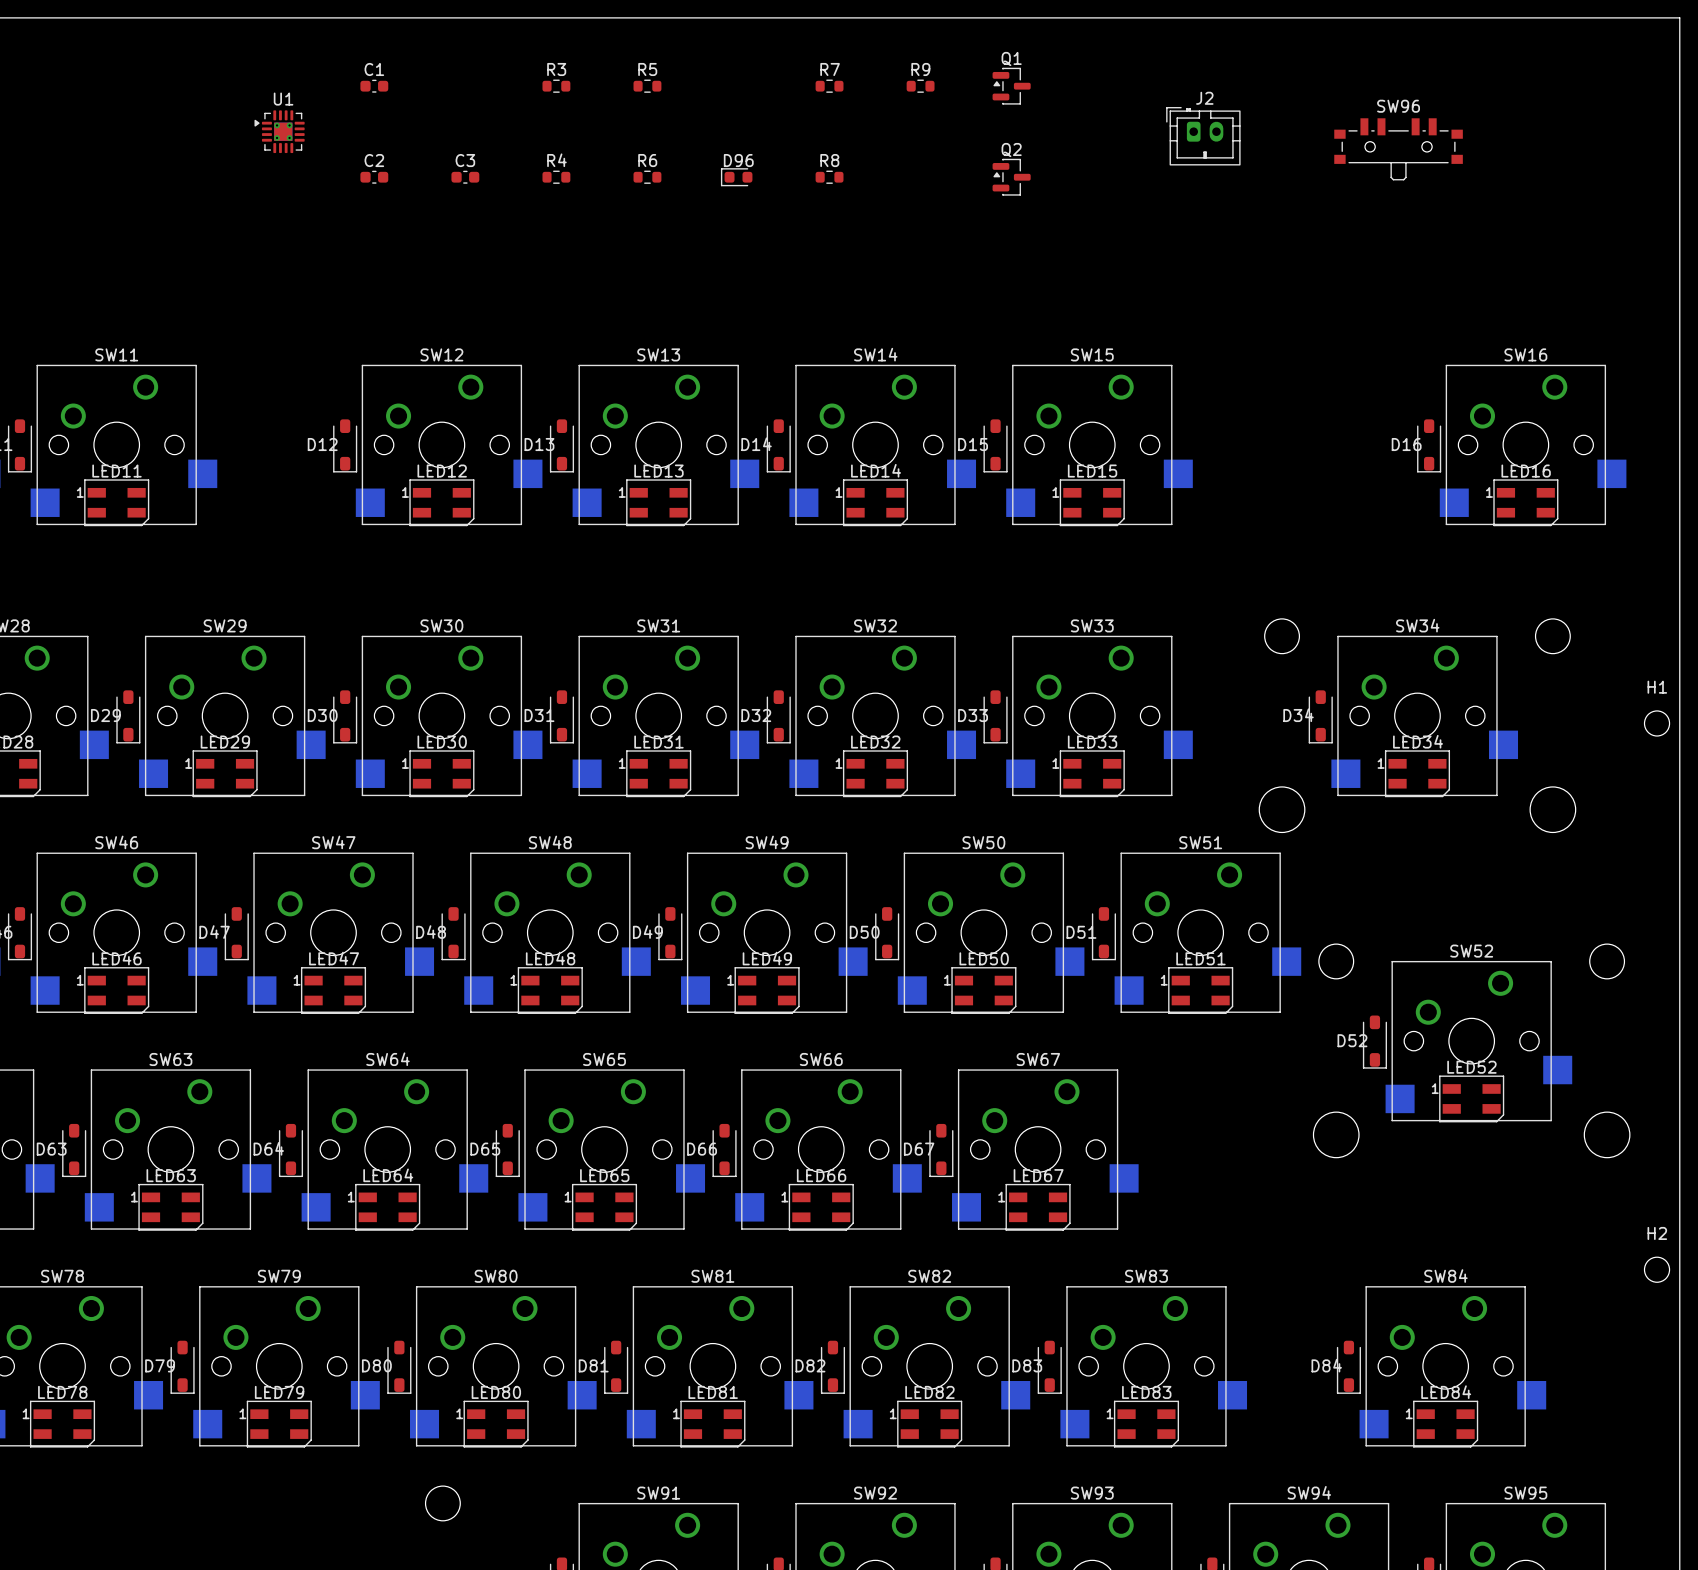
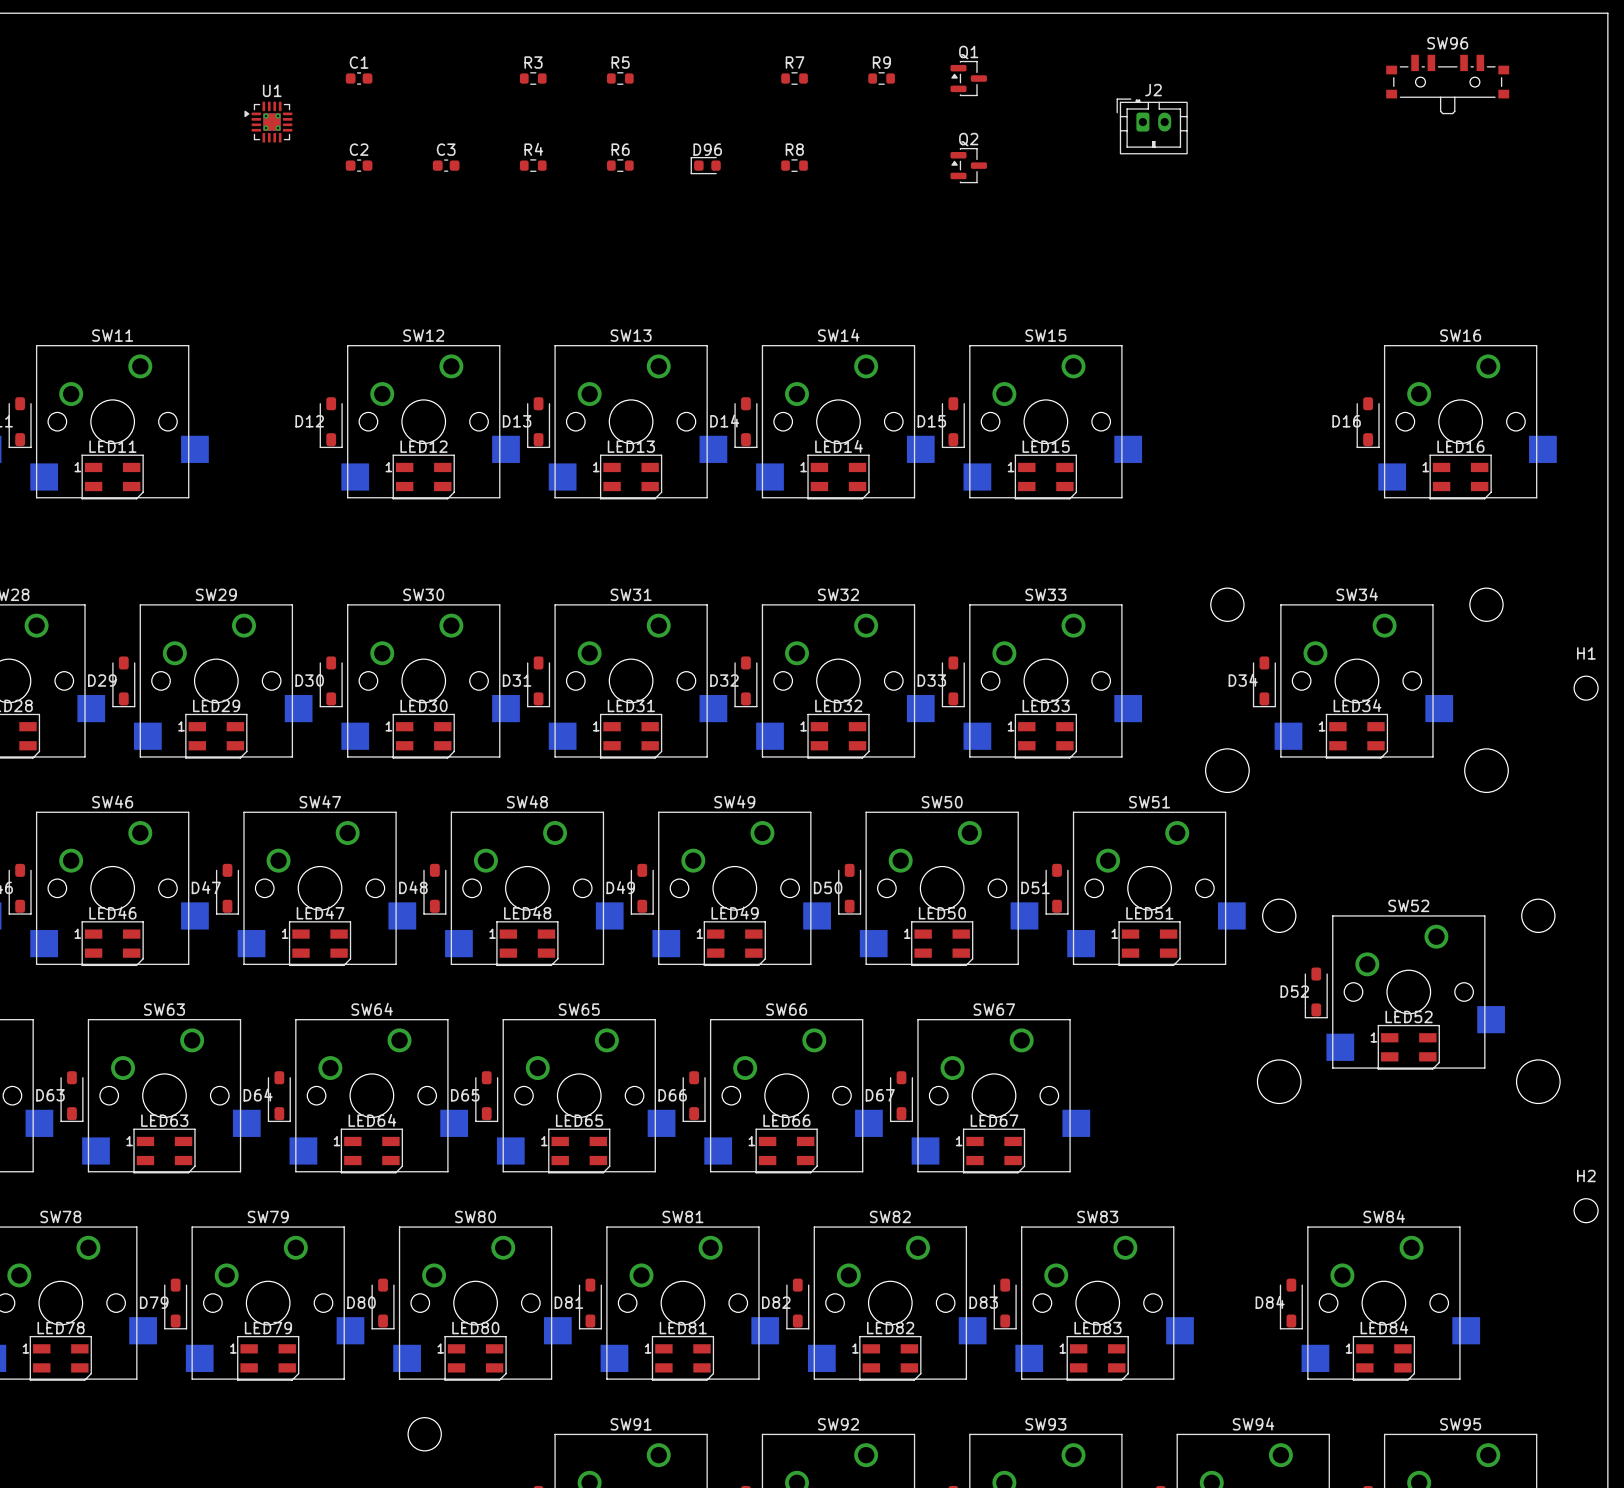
SW96 position: (1398, 149) -> (1447, 84)

